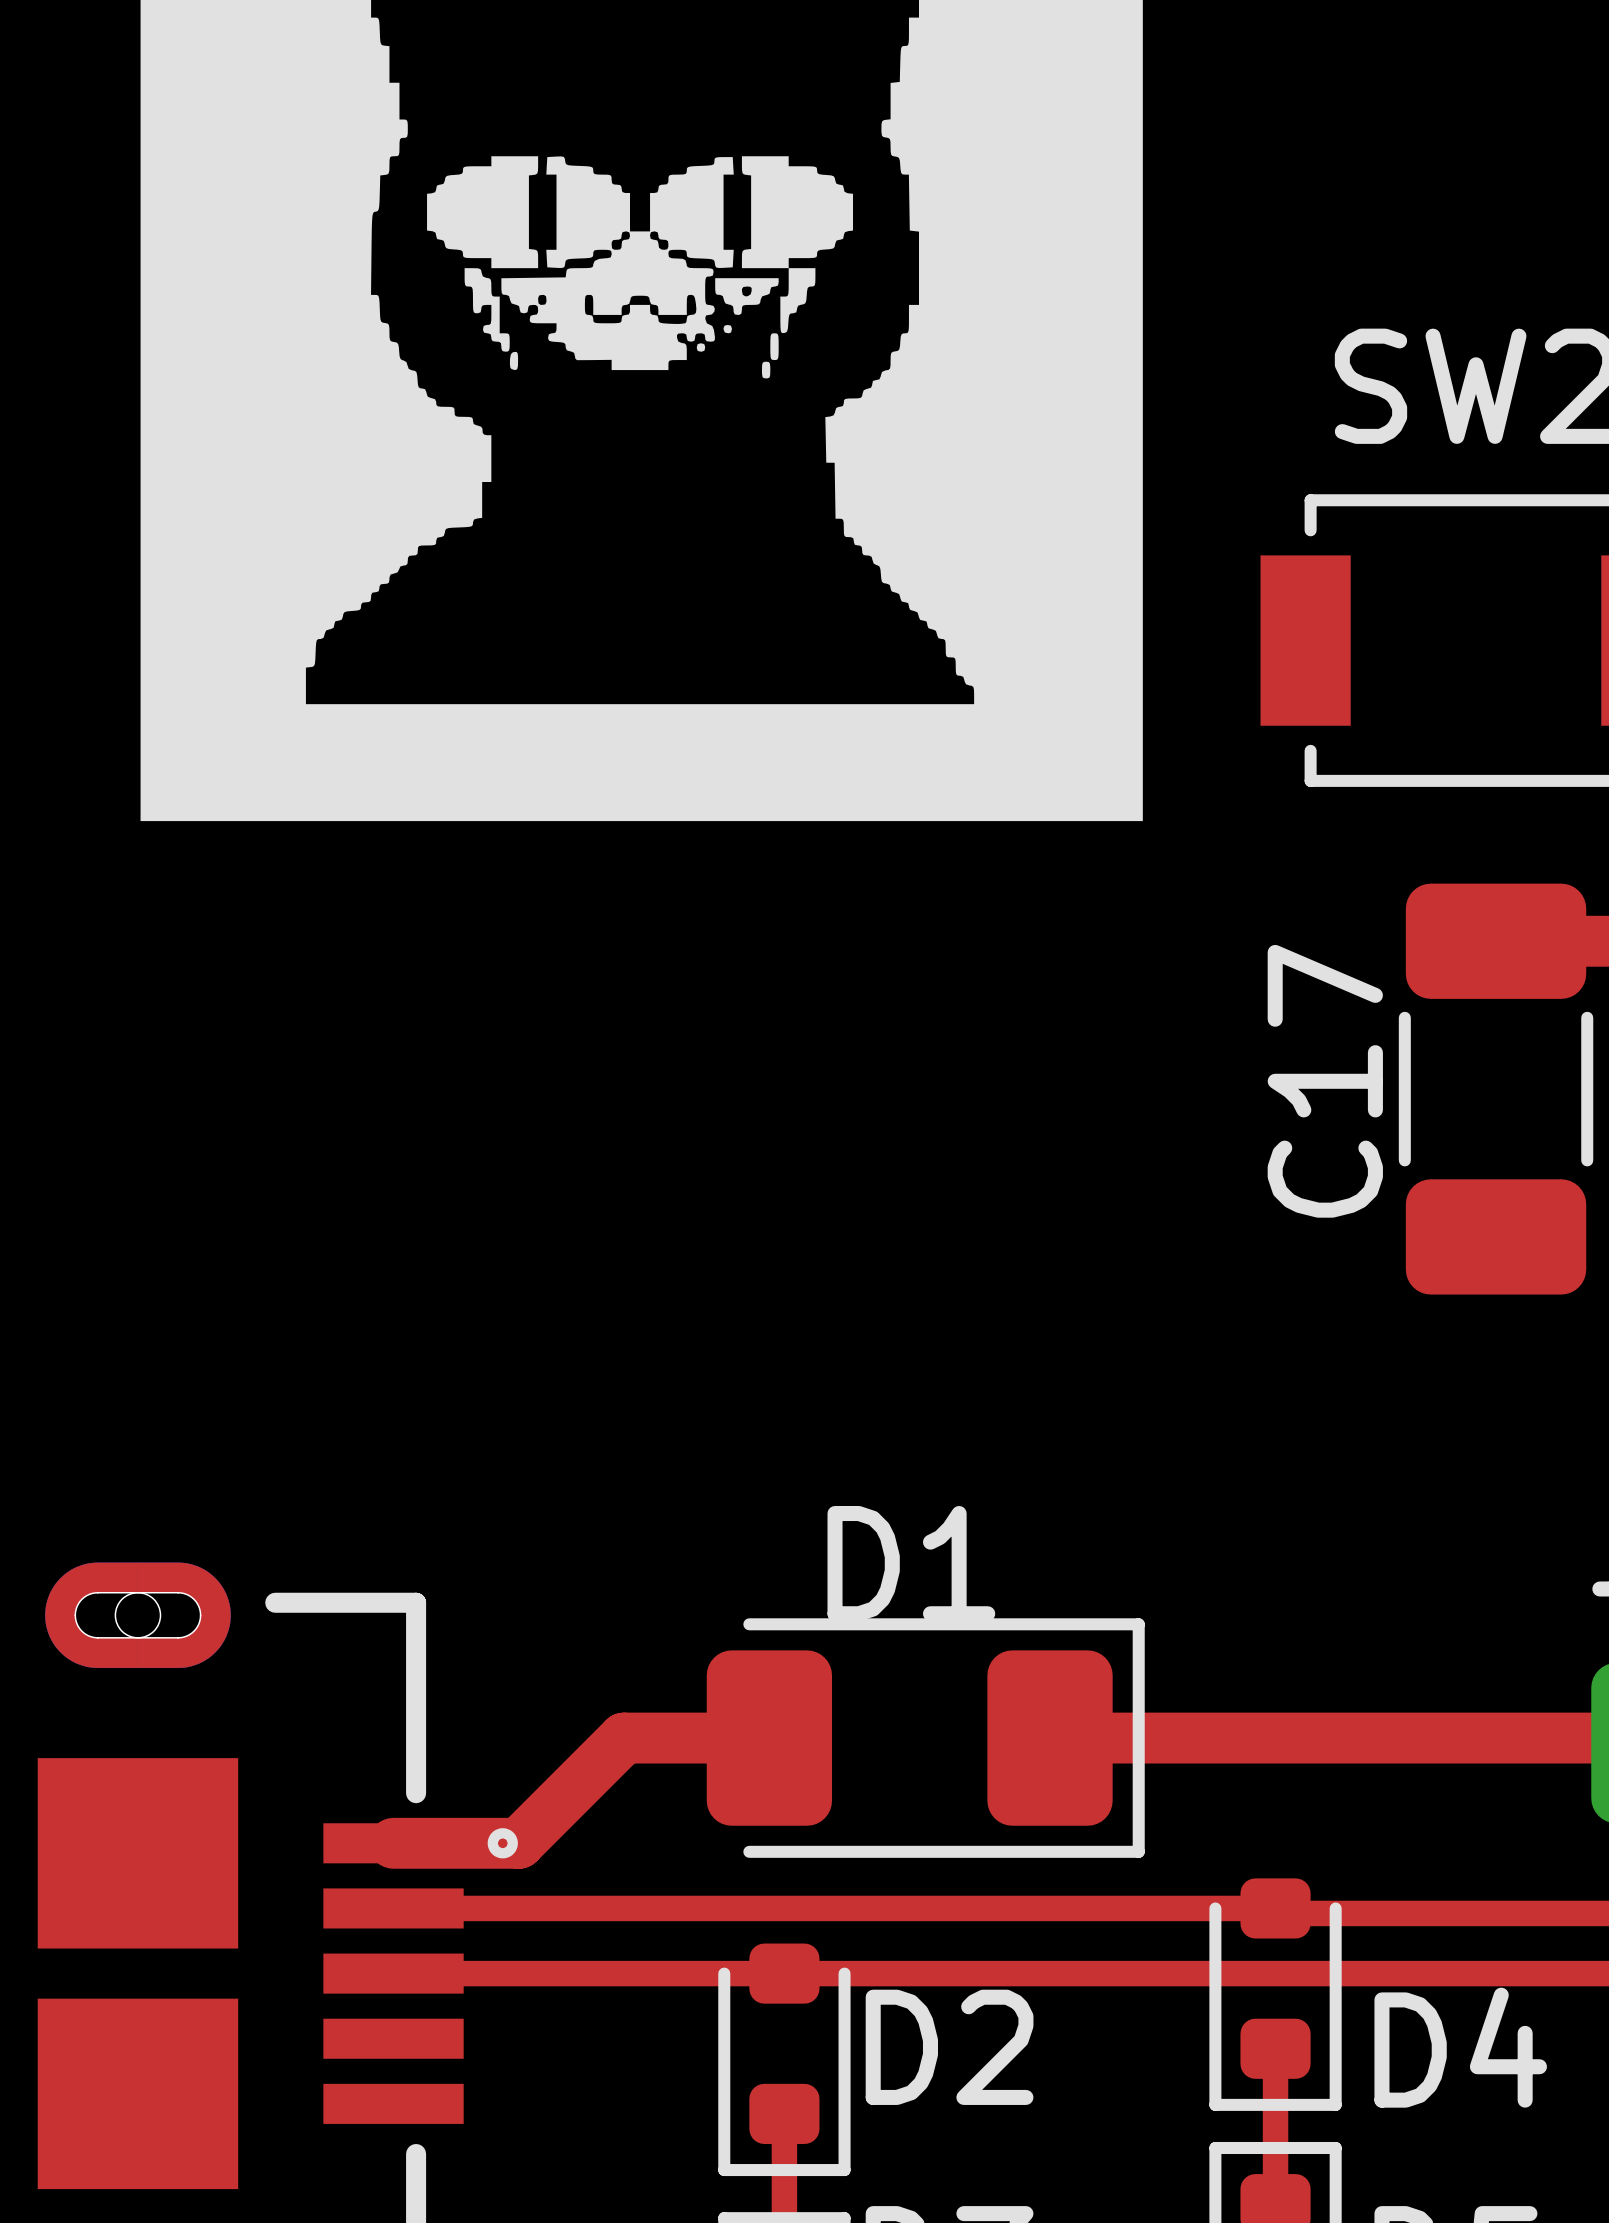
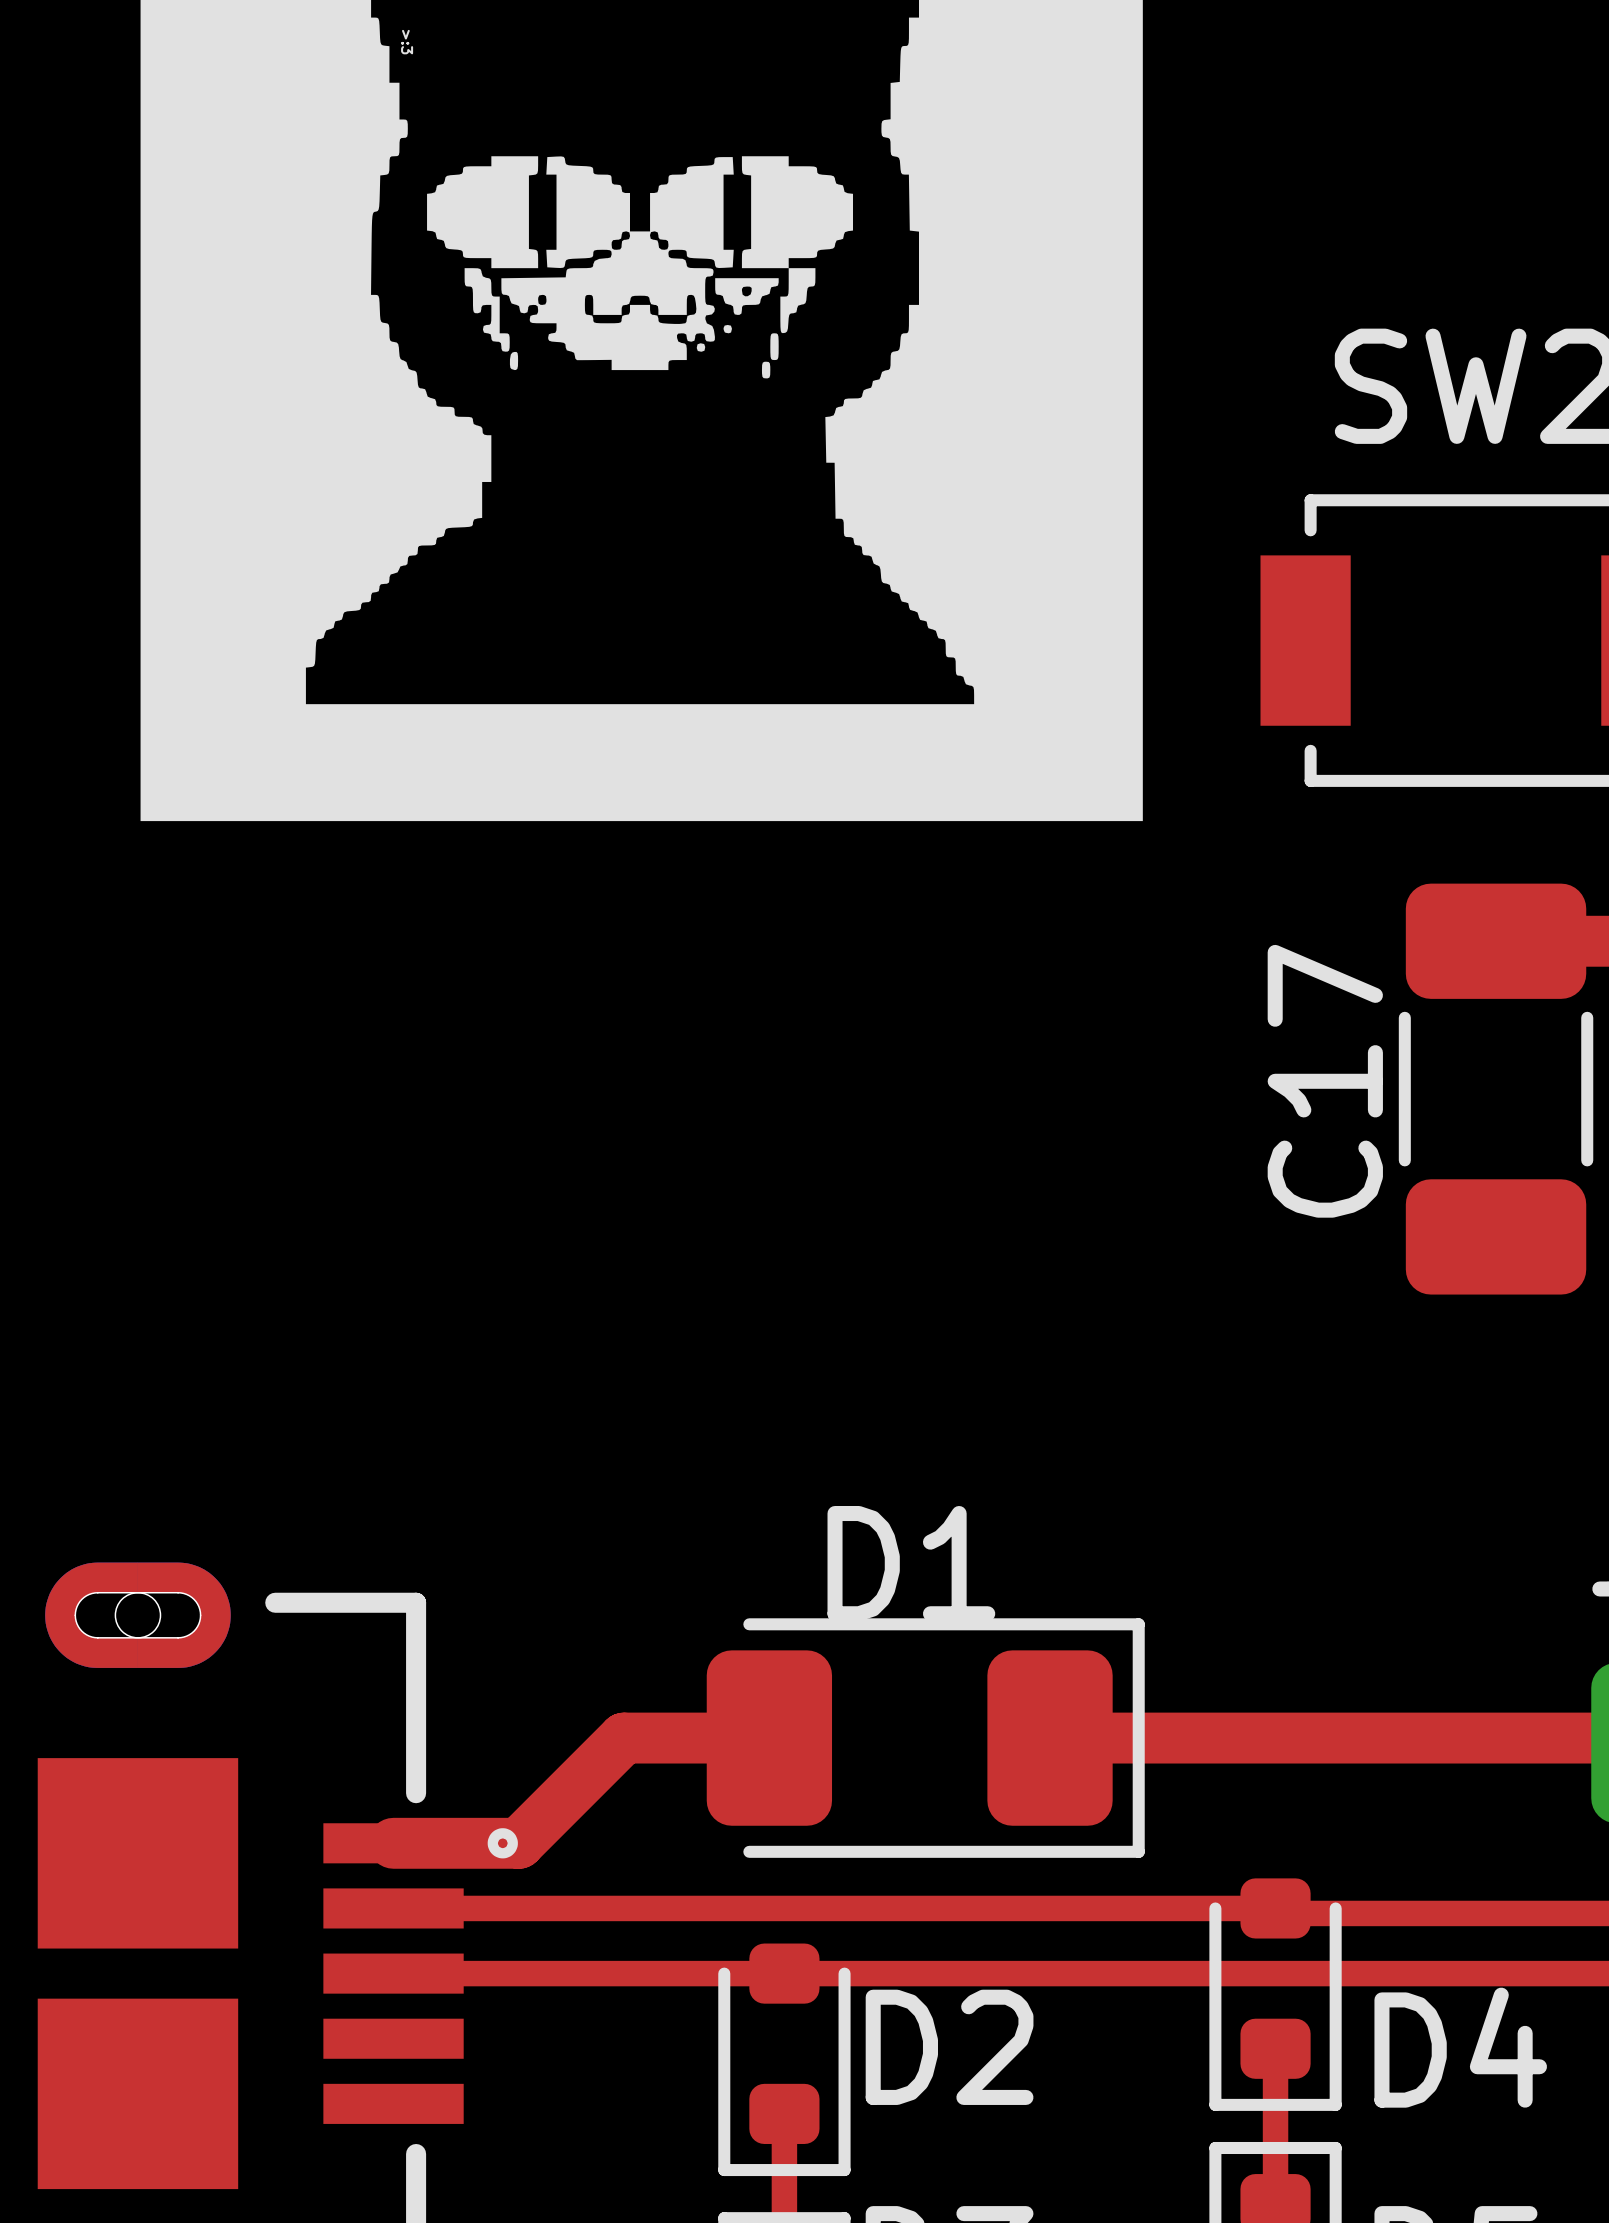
text: none -> >:3 (407, 42)

